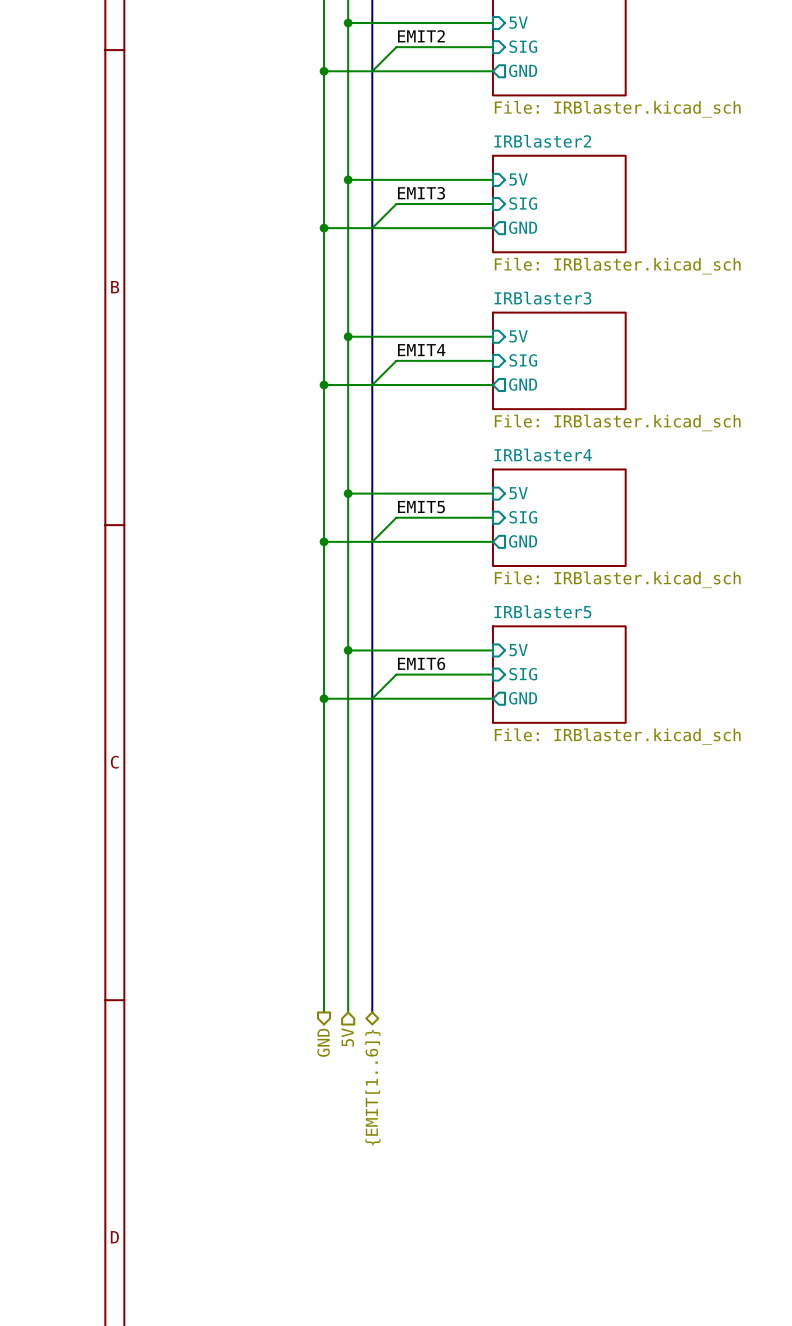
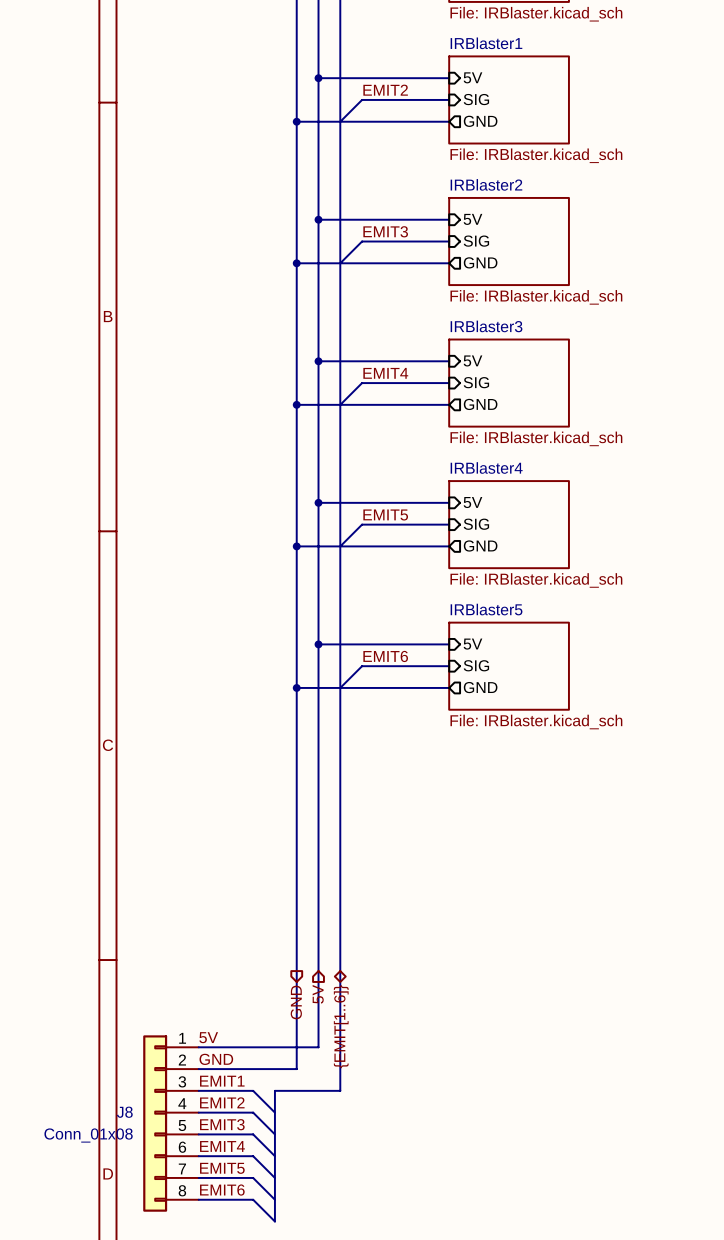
wire: none -> (296, 971) (296, 1069) (198, 1069)
wire: none -> (318, 971) (318, 1047) (198, 1047)
bus: none -> (340, 971) (340, 1090) (274, 1090) (274, 1221)
label: none -> 5V (208, 1037)
label: none -> GND (216, 1059)
label: none -> EMIT1 (222, 1081)
wire: none -> (198, 1090) (253, 1090) (274, 1112)
label: none -> EMIT2 (222, 1102)
wire: none -> (198, 1112) (253, 1112) (274, 1134)
J8: none -> Conn_01x08 (170, 1123)
label: none -> EMIT3 (222, 1124)
wire: none -> (198, 1134) (253, 1134) (274, 1156)
label: none -> EMIT4 (222, 1146)
wire: none -> (198, 1156) (253, 1156) (274, 1177)
label: none -> EMIT5 (222, 1168)
wire: none -> (198, 1177) (253, 1177) (274, 1199)
label: none -> EMIT6 (222, 1190)
wire: none -> (198, 1199) (253, 1199) (274, 1221)

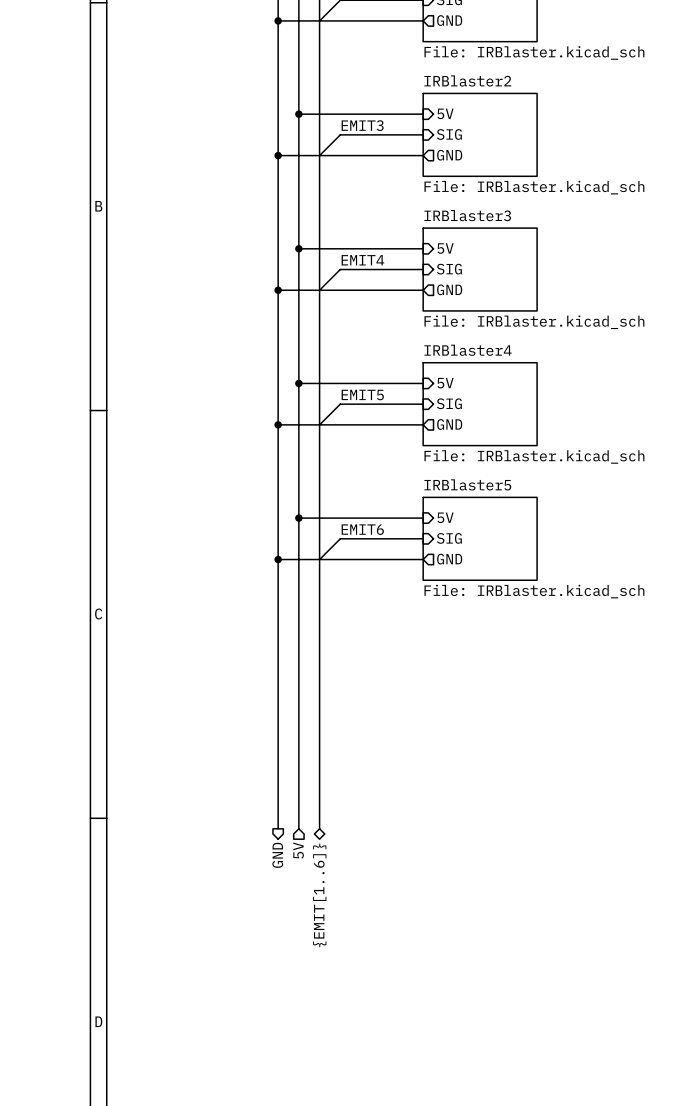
wire: (296, 971) (296, 1069) (198, 1069) -> none
wire: (318, 971) (318, 1047) (198, 1047) -> none
bus: (340, 971) (340, 1090) (274, 1090) (274, 1221) -> none
label: 5V (208, 1037) -> none
label: GND (216, 1059) -> none
label: EMIT1 (222, 1081) -> none
wire: (198, 1090) (253, 1090) (274, 1112) -> none
label: EMIT2 (222, 1102) -> none
wire: (198, 1112) (253, 1112) (274, 1134) -> none
J8: Conn_01x08 (170, 1123) -> none
label: EMIT3 (222, 1124) -> none
wire: (198, 1134) (253, 1134) (274, 1156) -> none
label: EMIT4 (222, 1146) -> none
wire: (198, 1156) (253, 1156) (274, 1177) -> none
label: EMIT5 (222, 1168) -> none
wire: (198, 1177) (253, 1177) (274, 1199) -> none
label: EMIT6 (222, 1190) -> none
wire: (198, 1199) (253, 1199) (274, 1221) -> none

